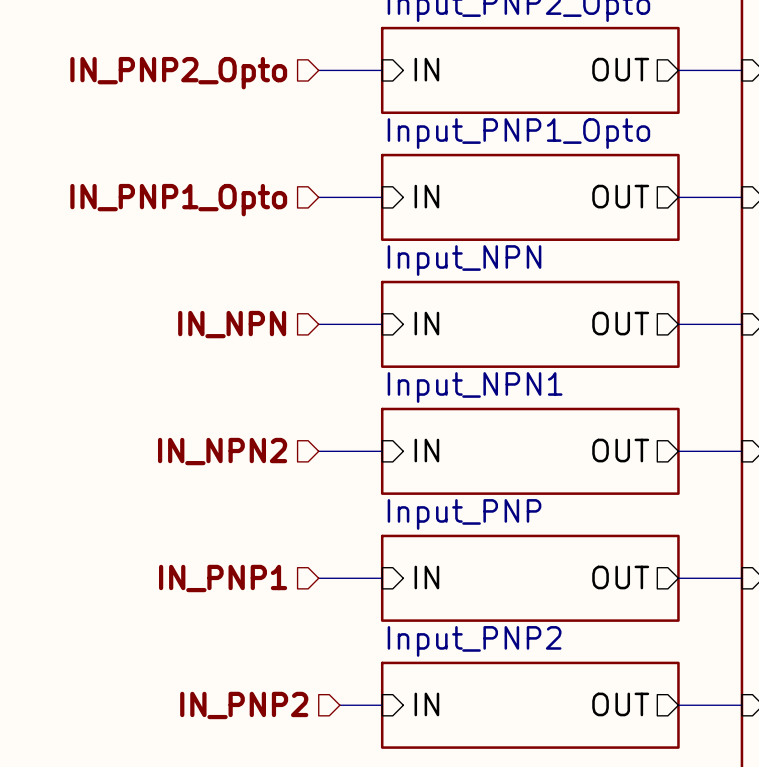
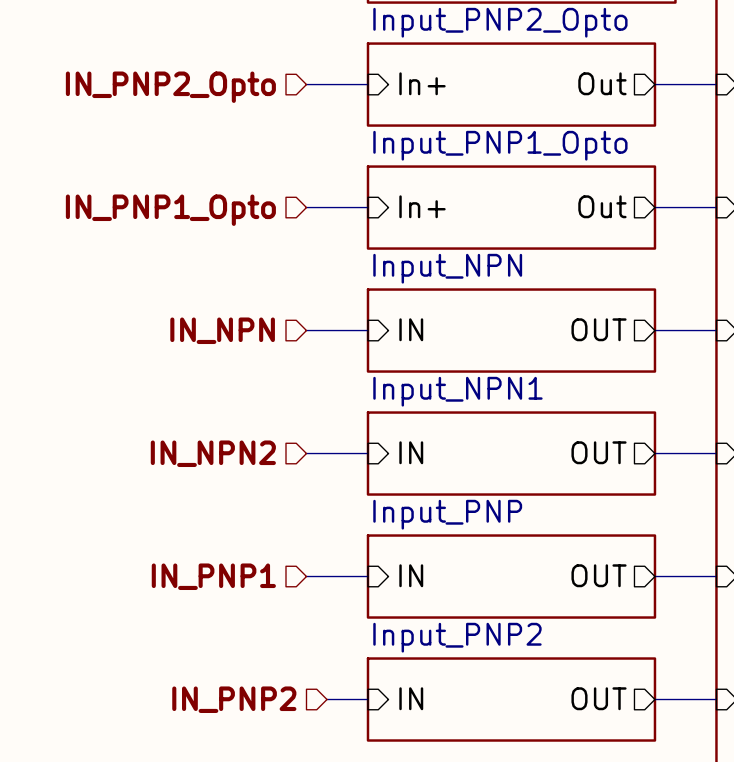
sheet pin: IN (426, 69) -> In+ (422, 83)
sheet pin: OUT (620, 69) -> Out (602, 83)
sheet pin: IN (426, 196) -> In+ (422, 206)
sheet pin: OUT (620, 196) -> Out (602, 206)

